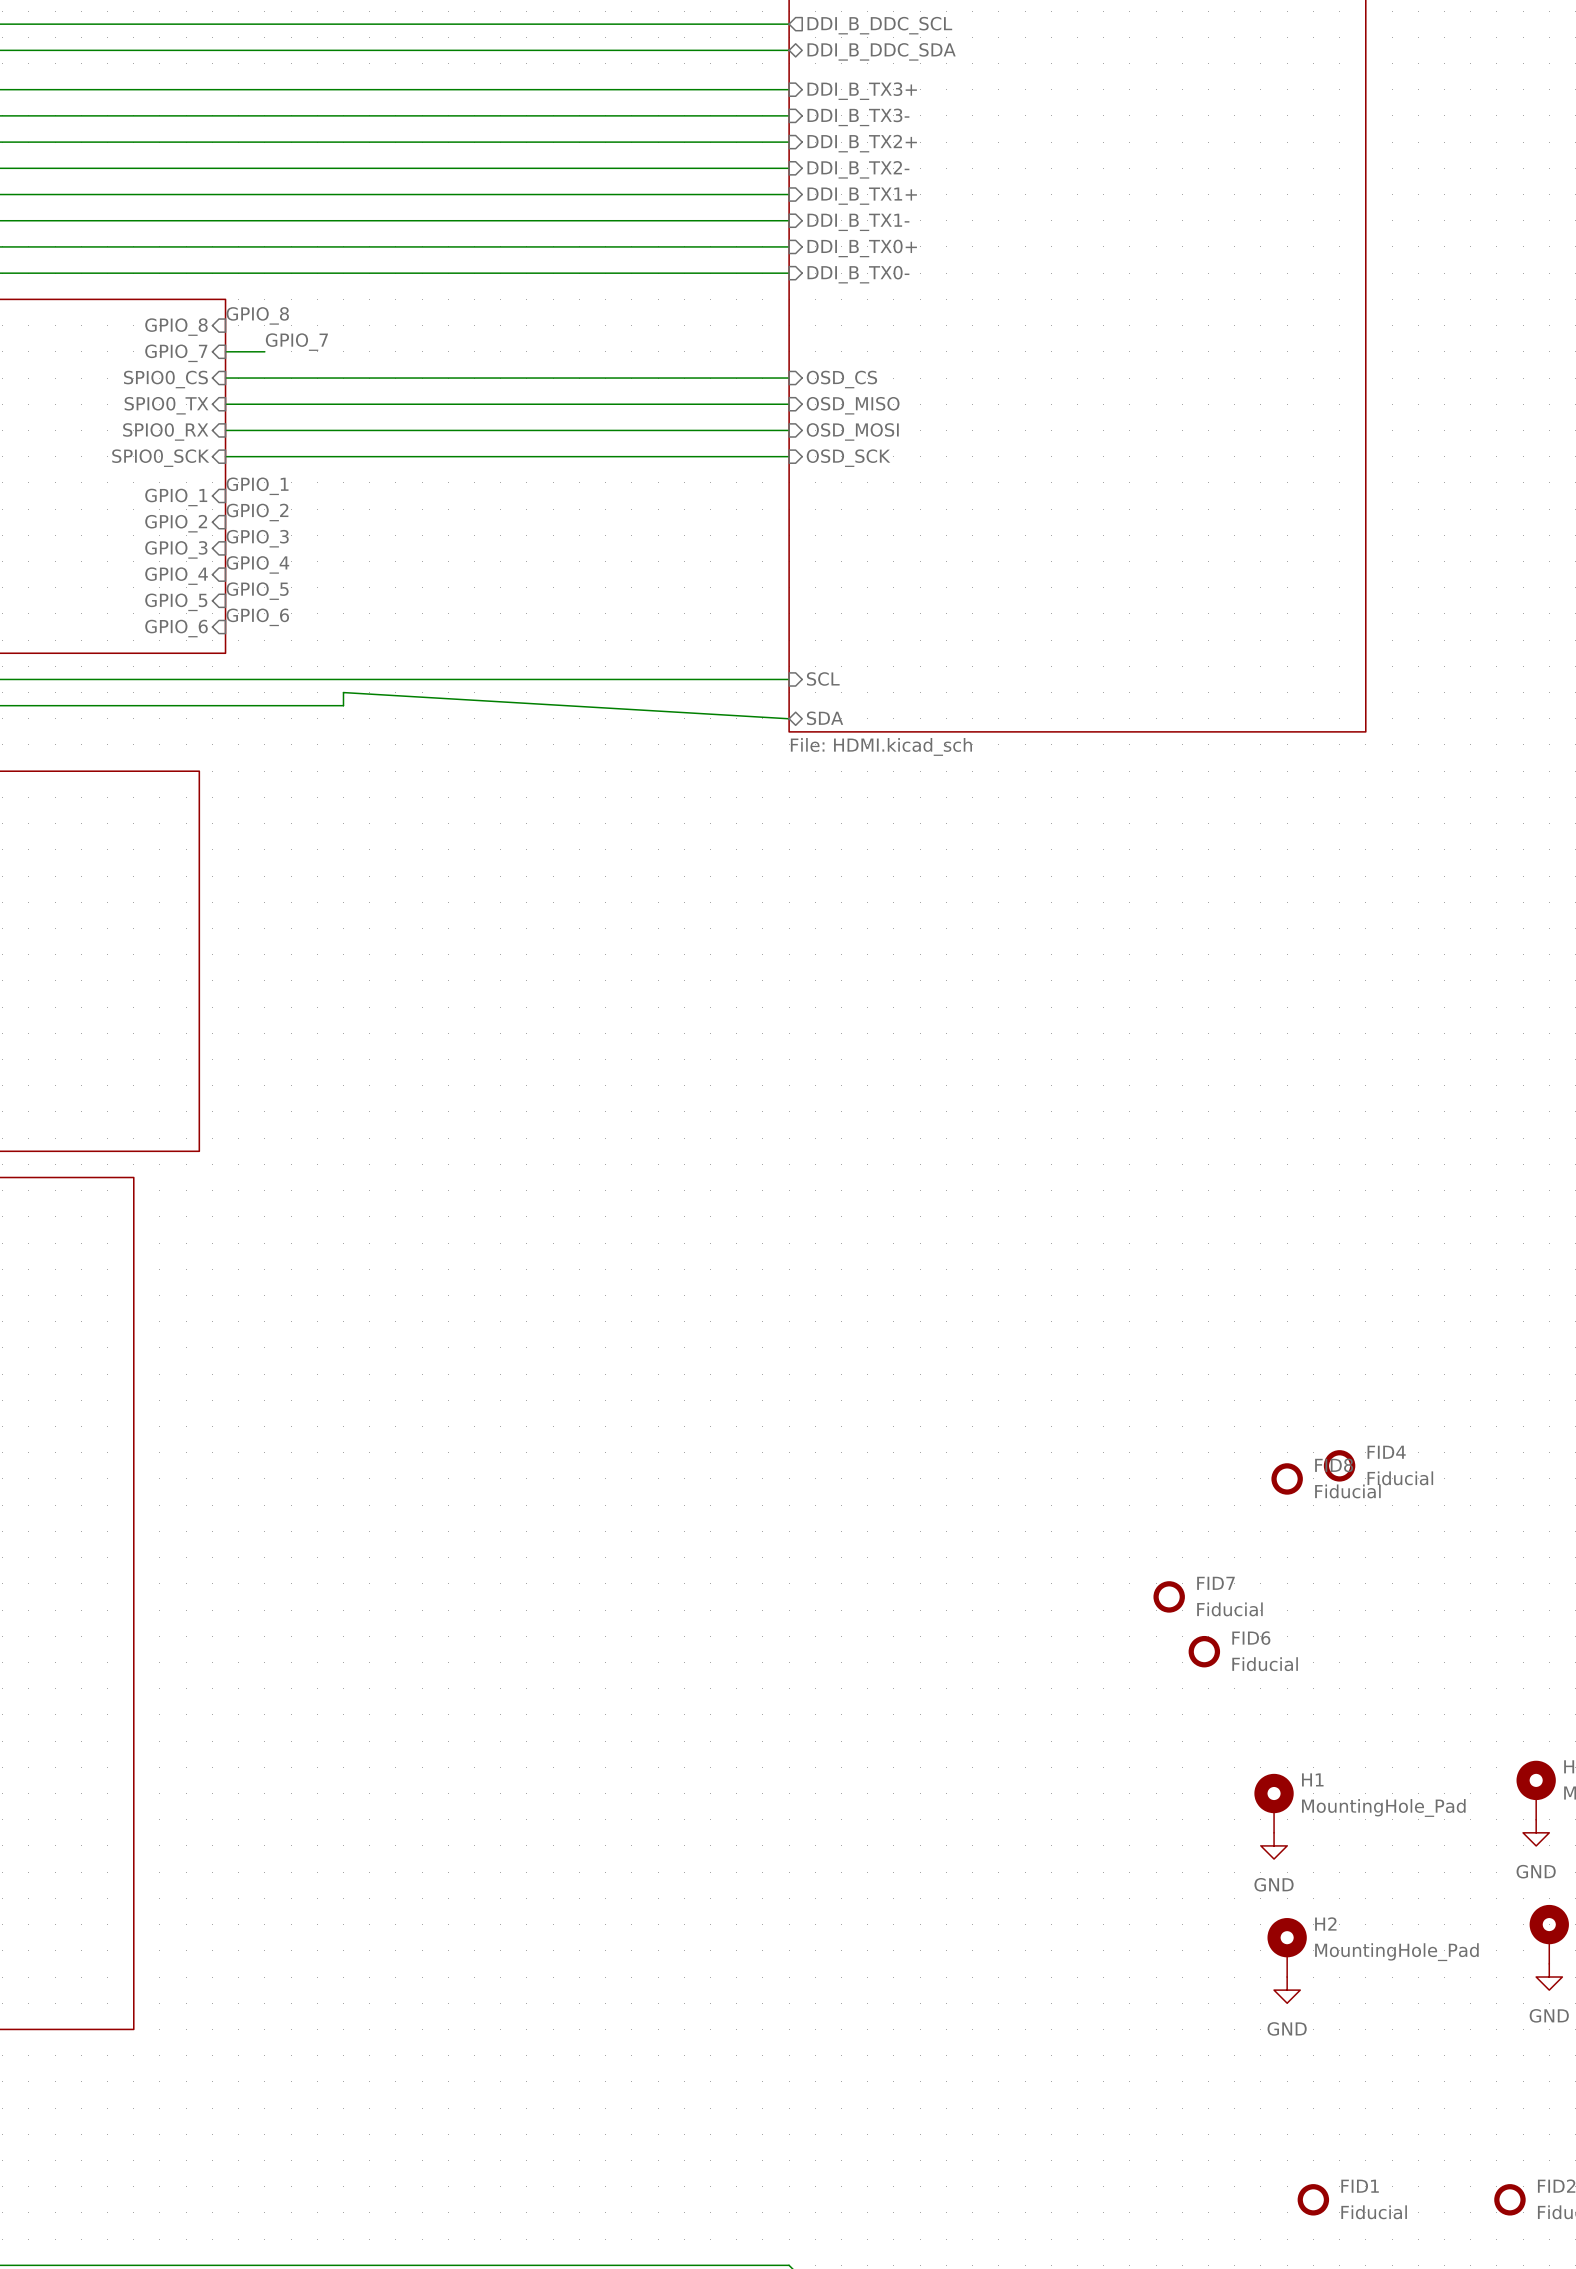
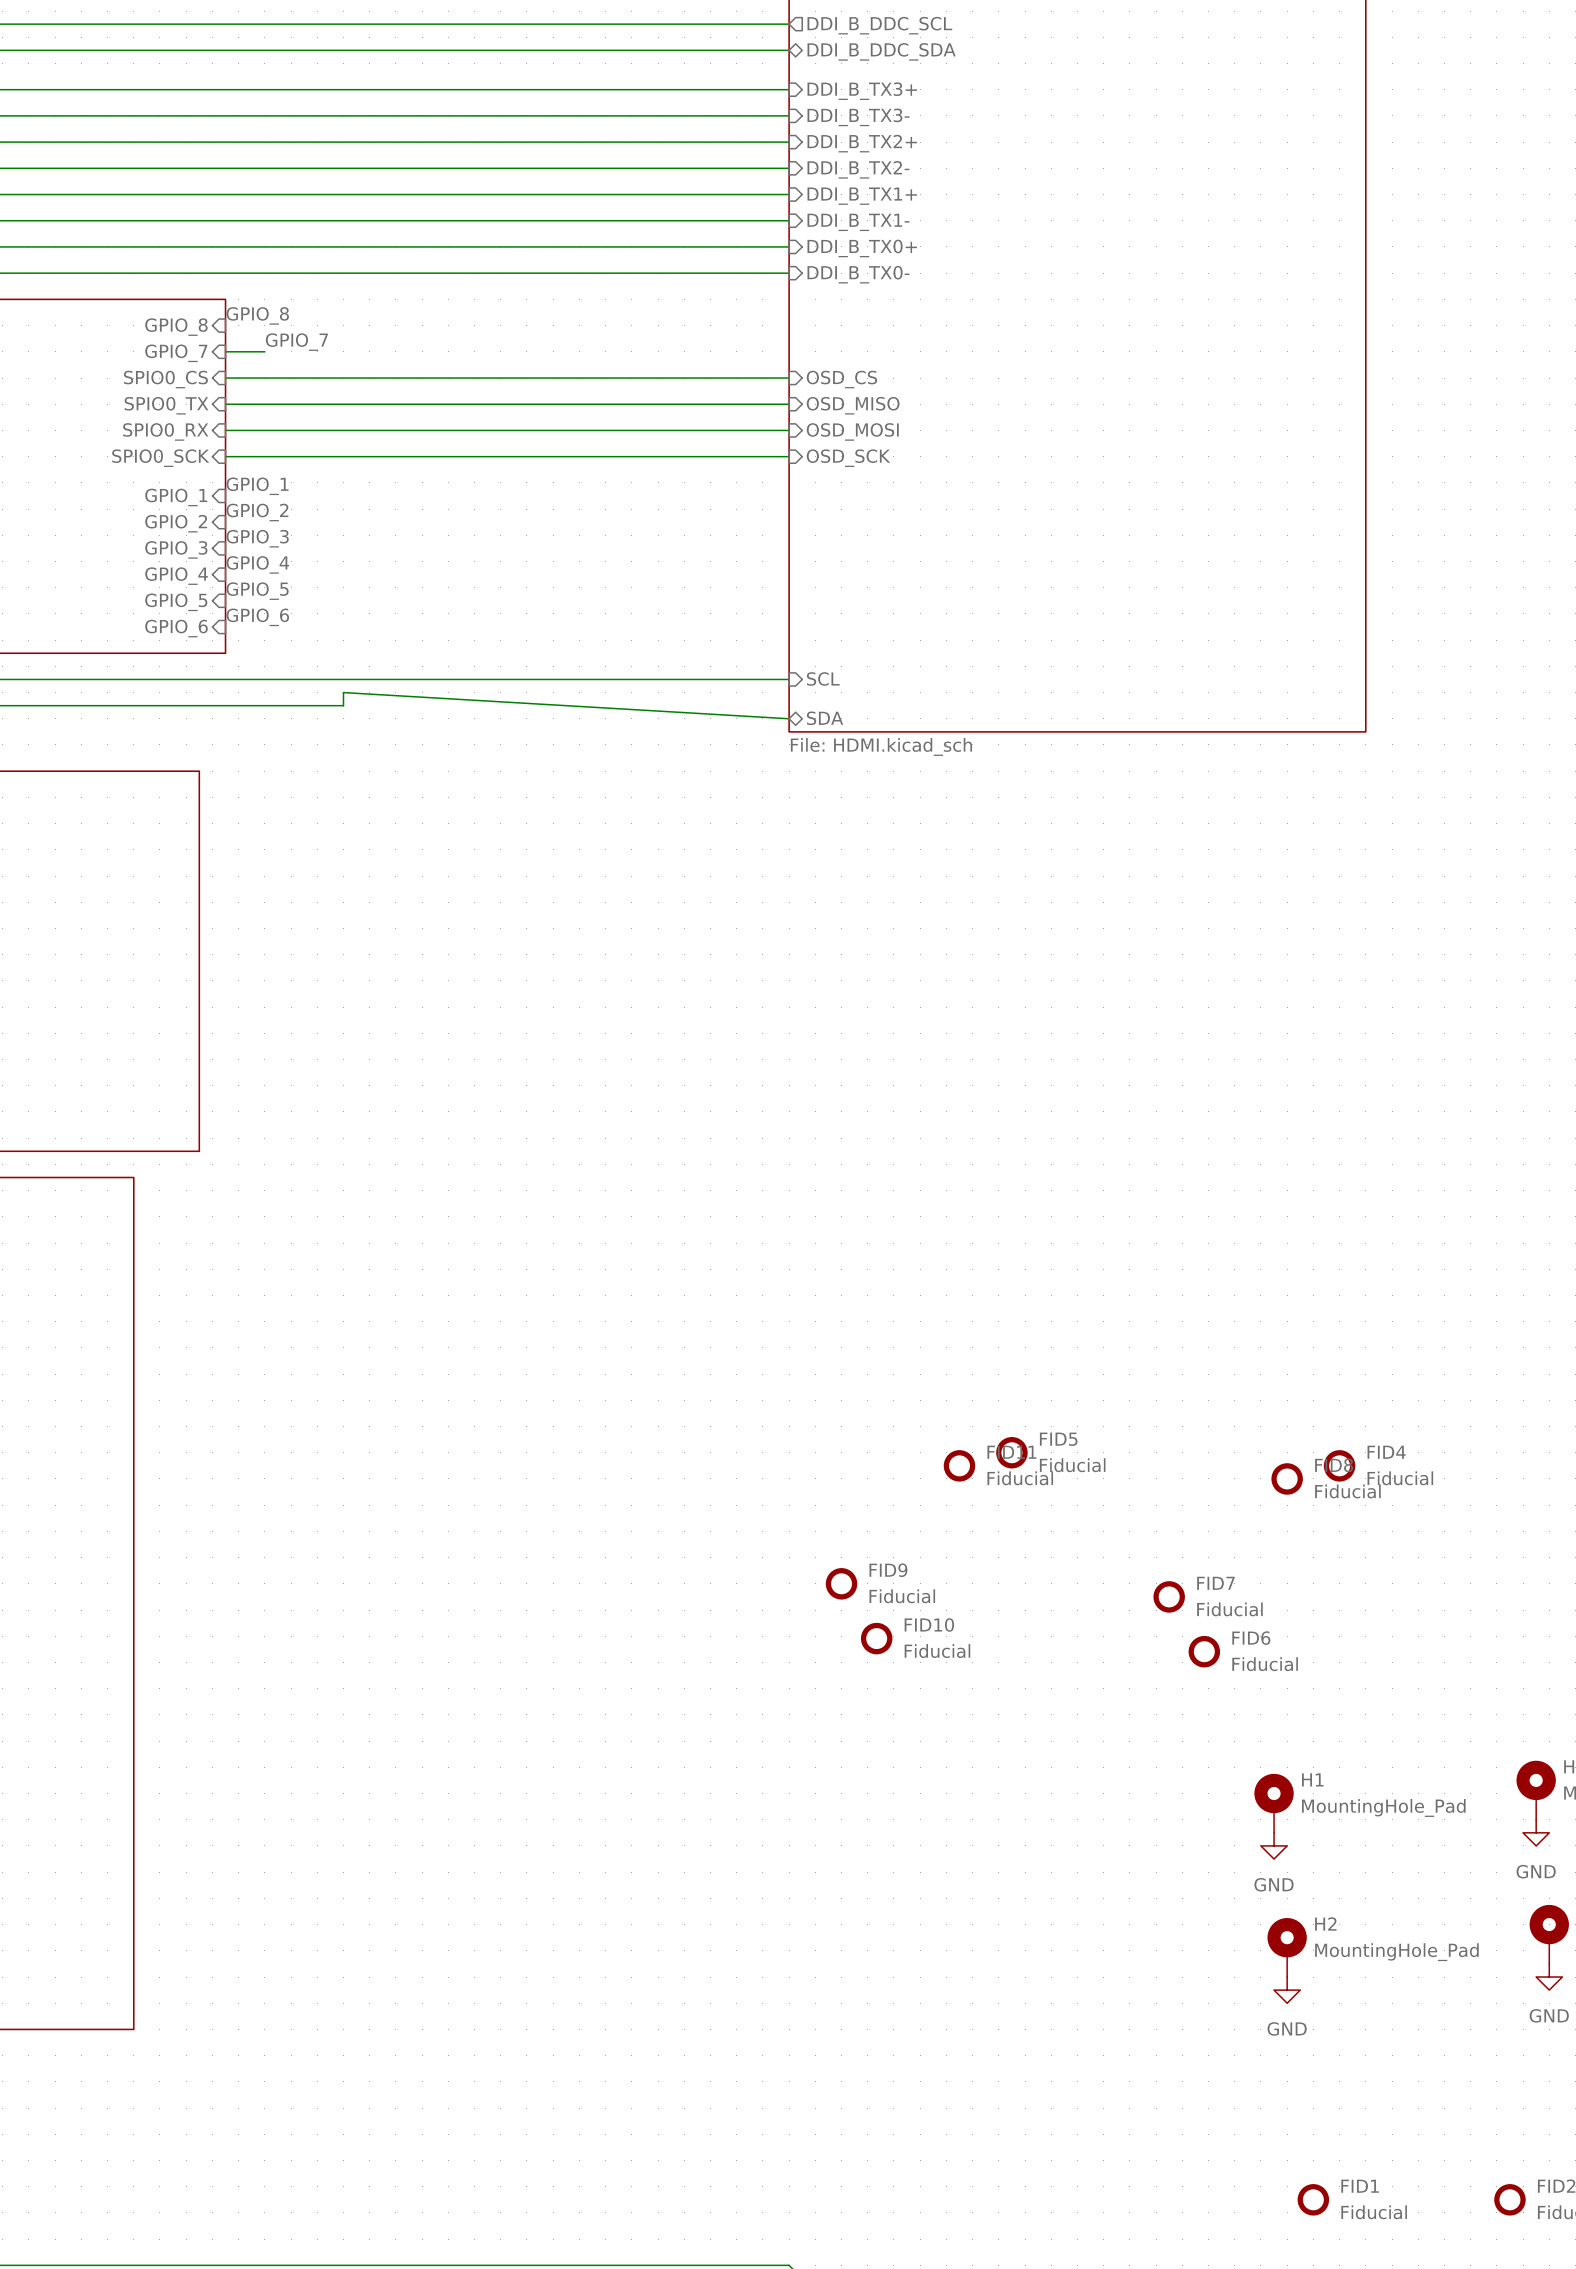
FID5: none -> Fiducial (1011, 1452)
FID11: none -> Fiducial (959, 1465)
FID9: none -> Fiducial (841, 1583)
FID10: none -> Fiducial (876, 1638)

